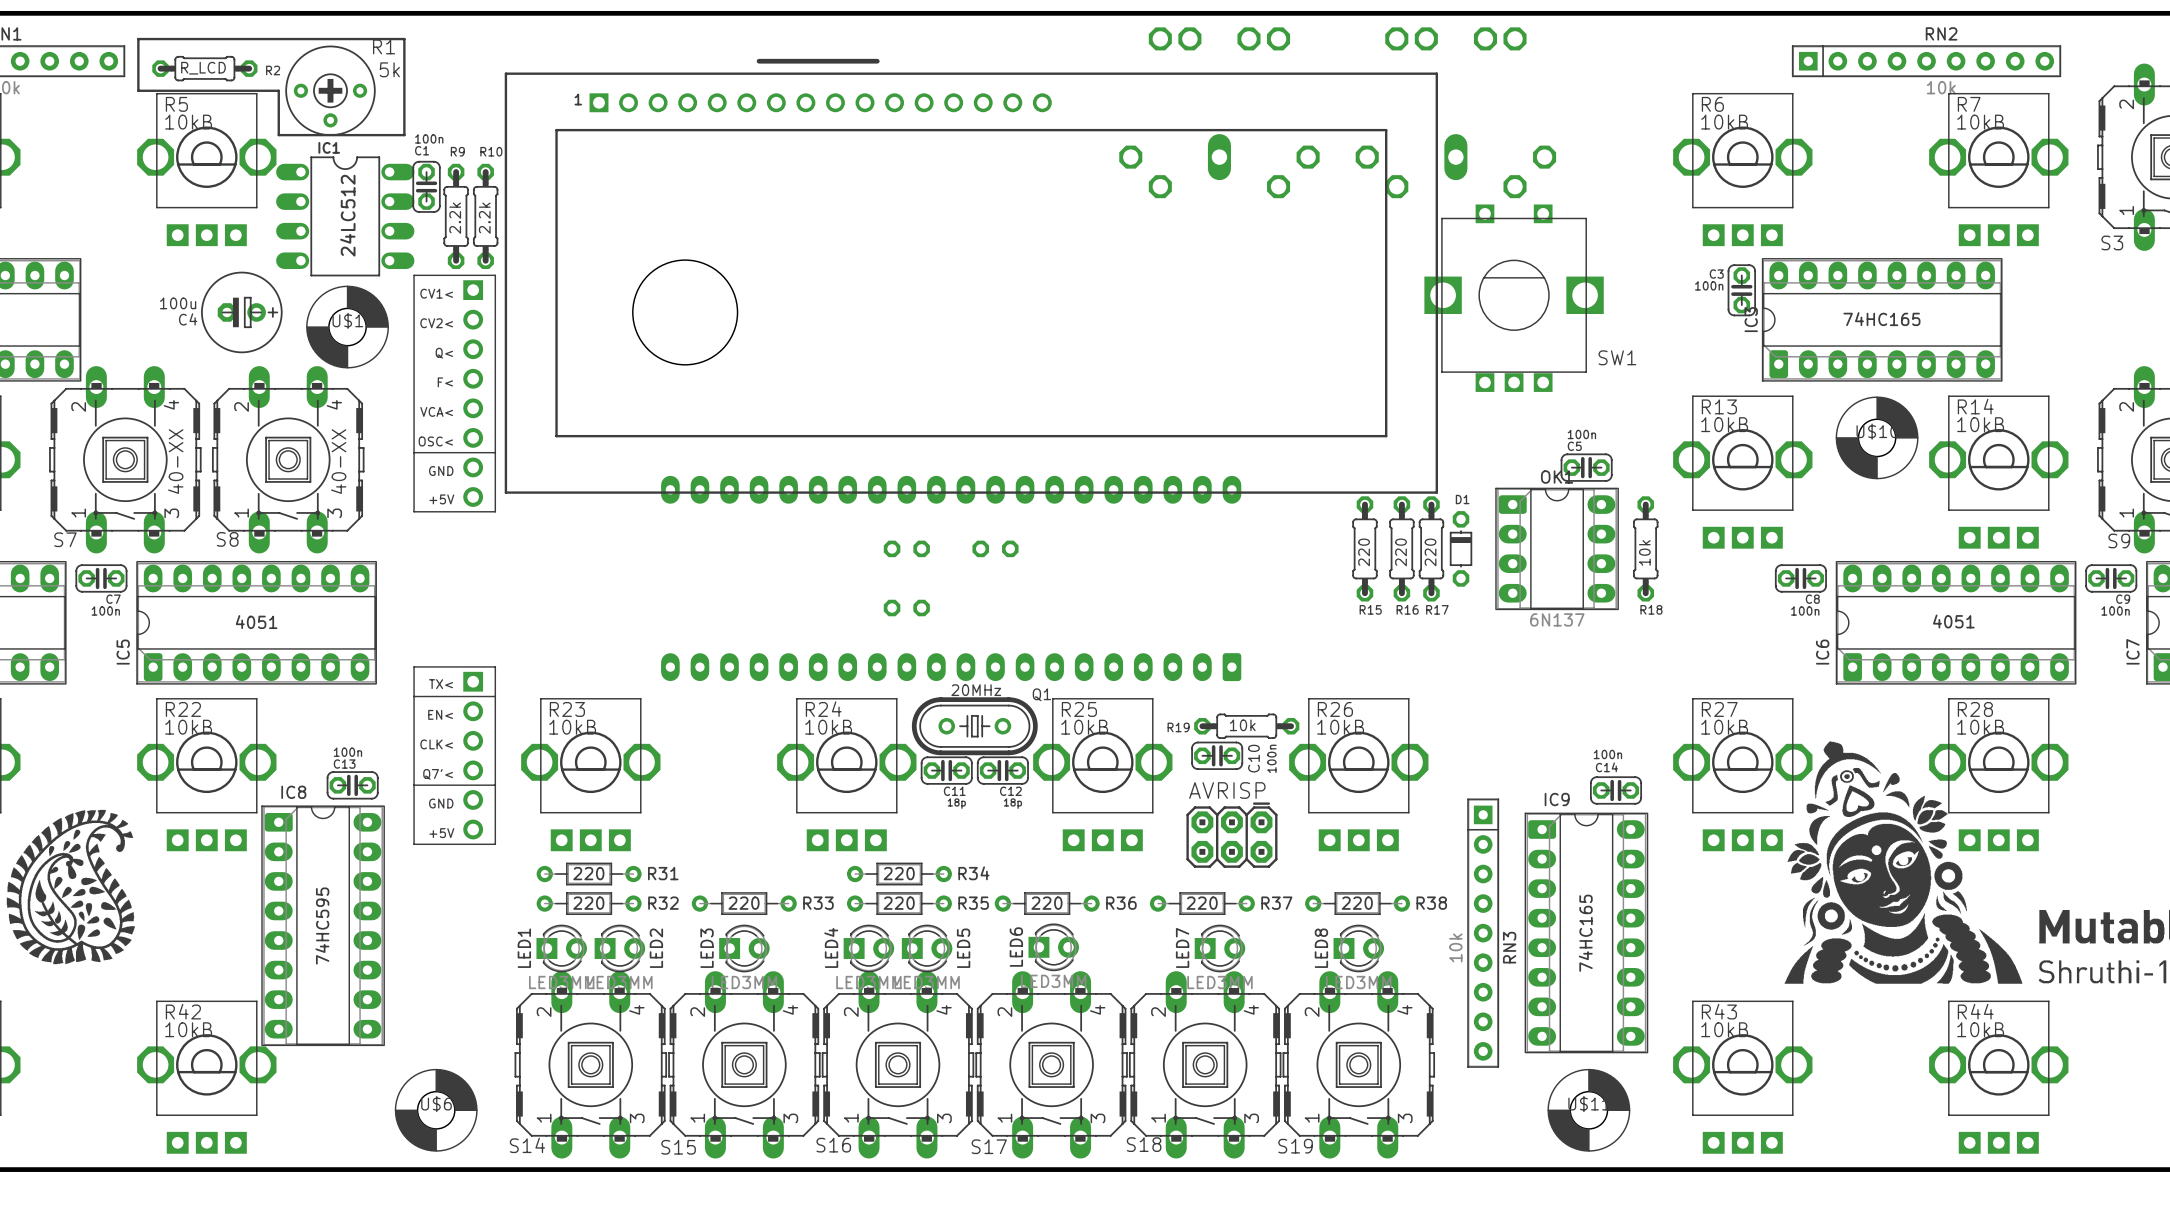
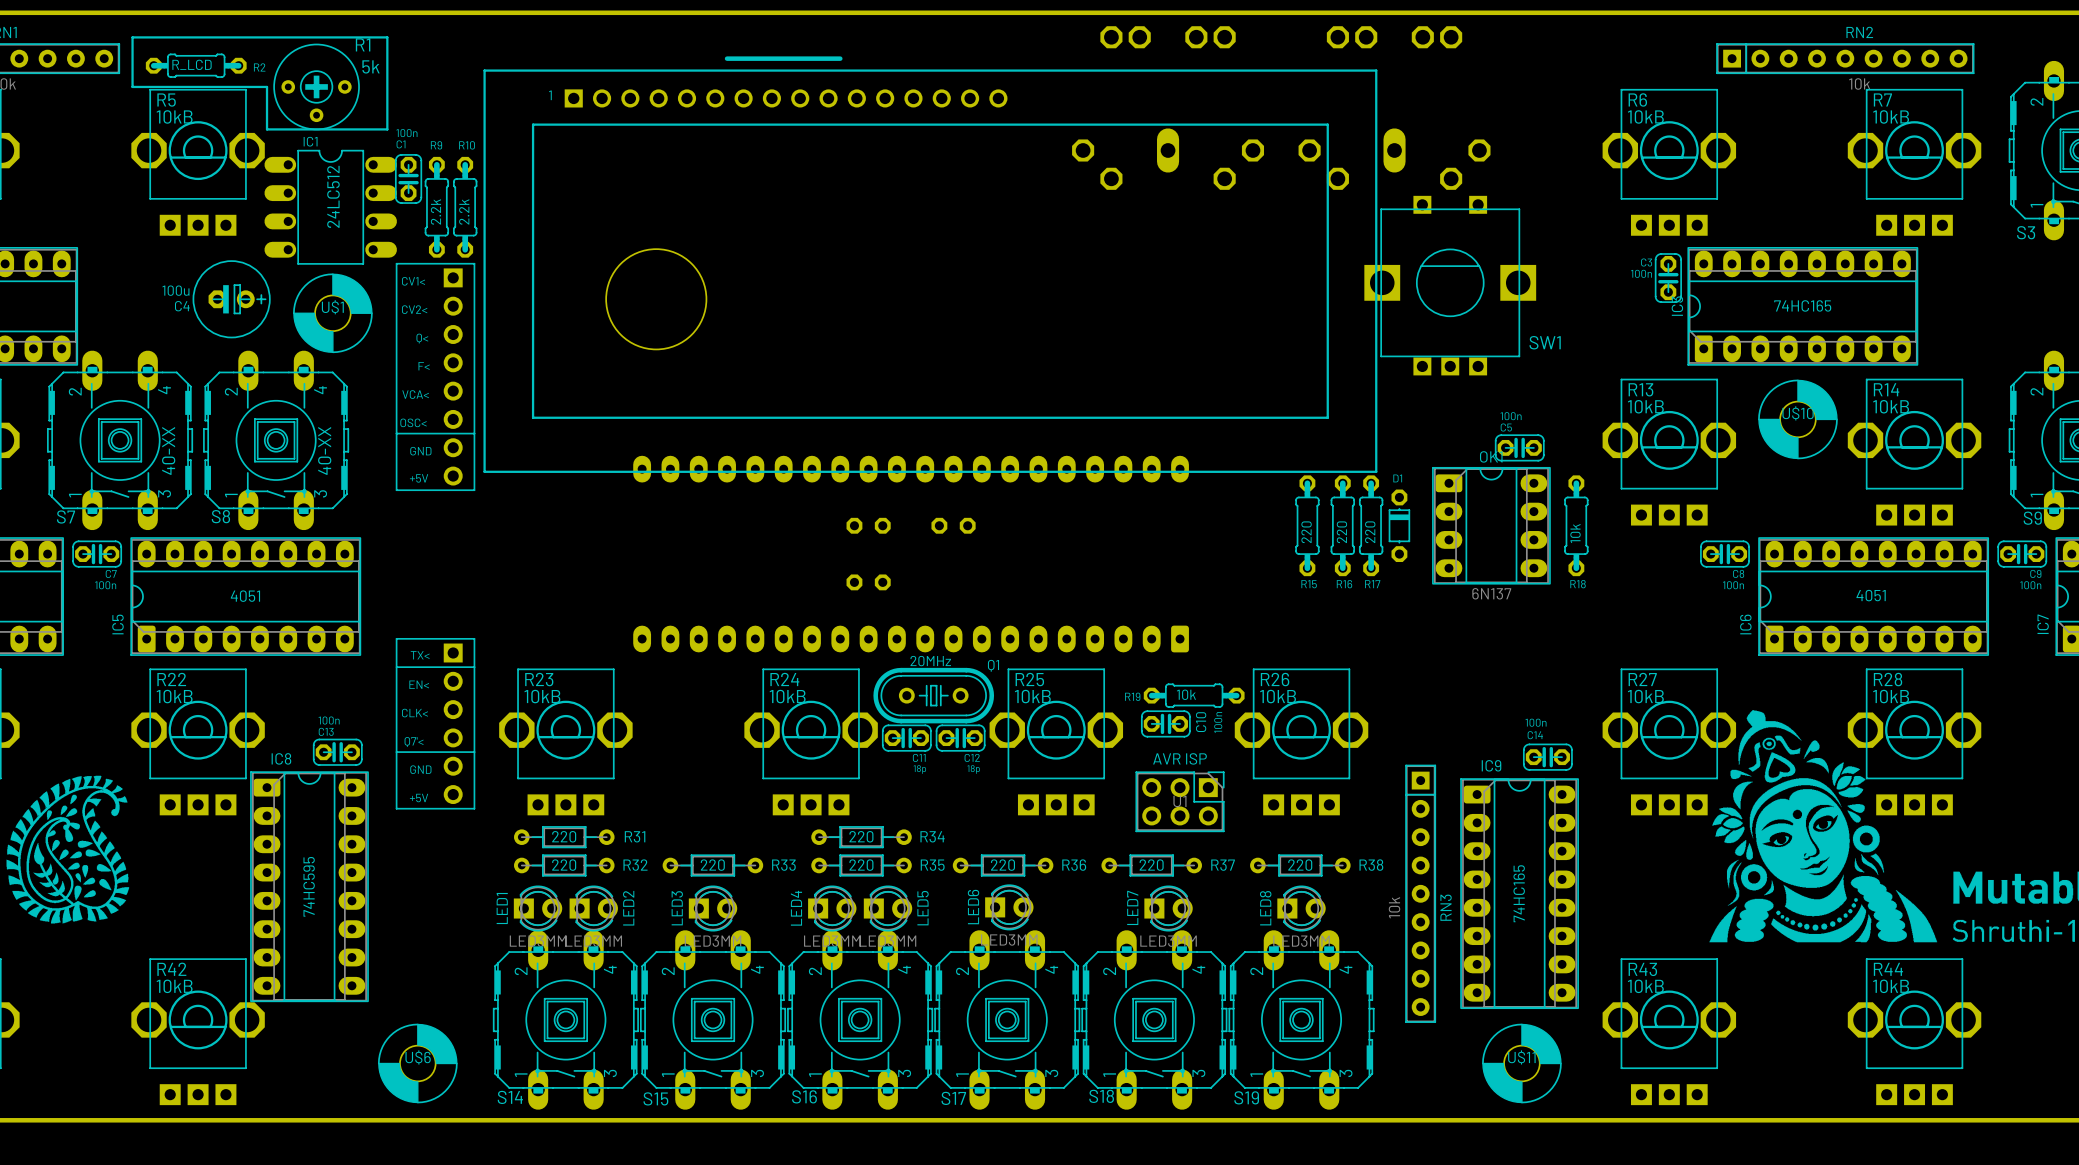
part: AVRISP (1231, 835) -> none
U1: none -> AVR ISP (1180, 801)

